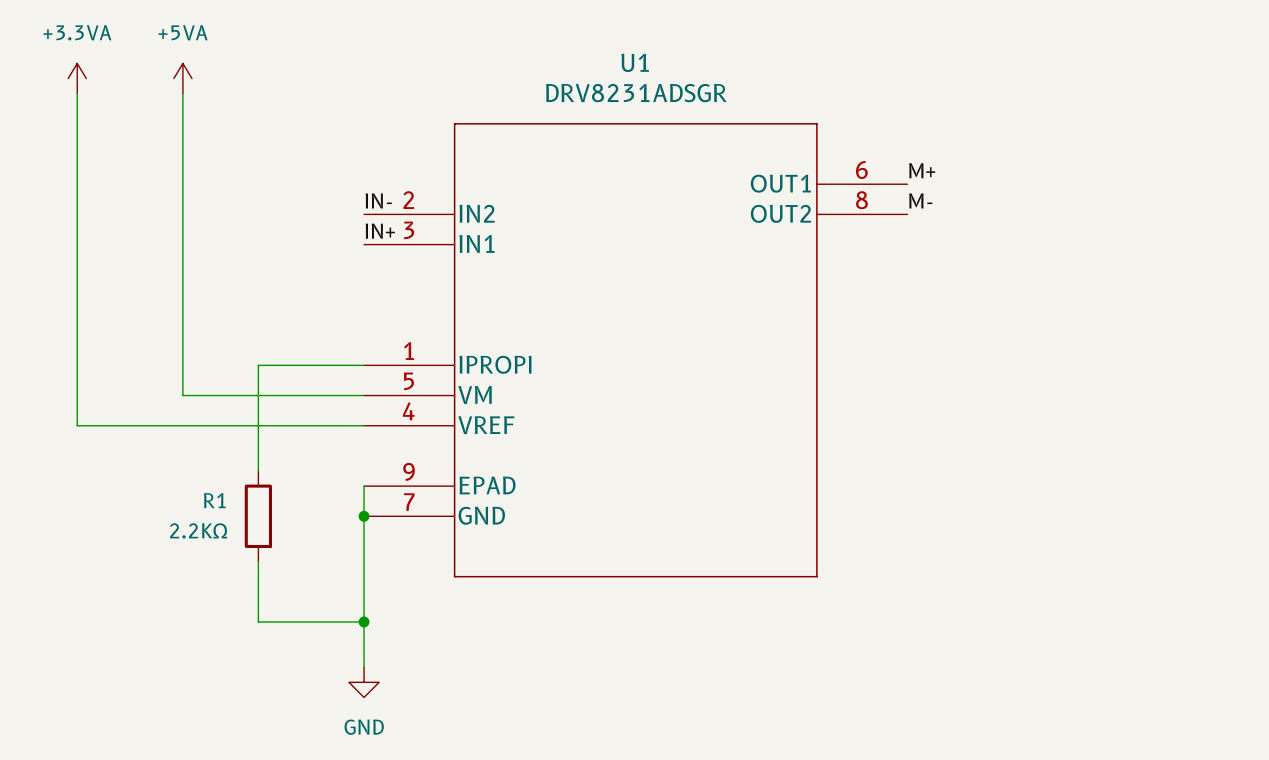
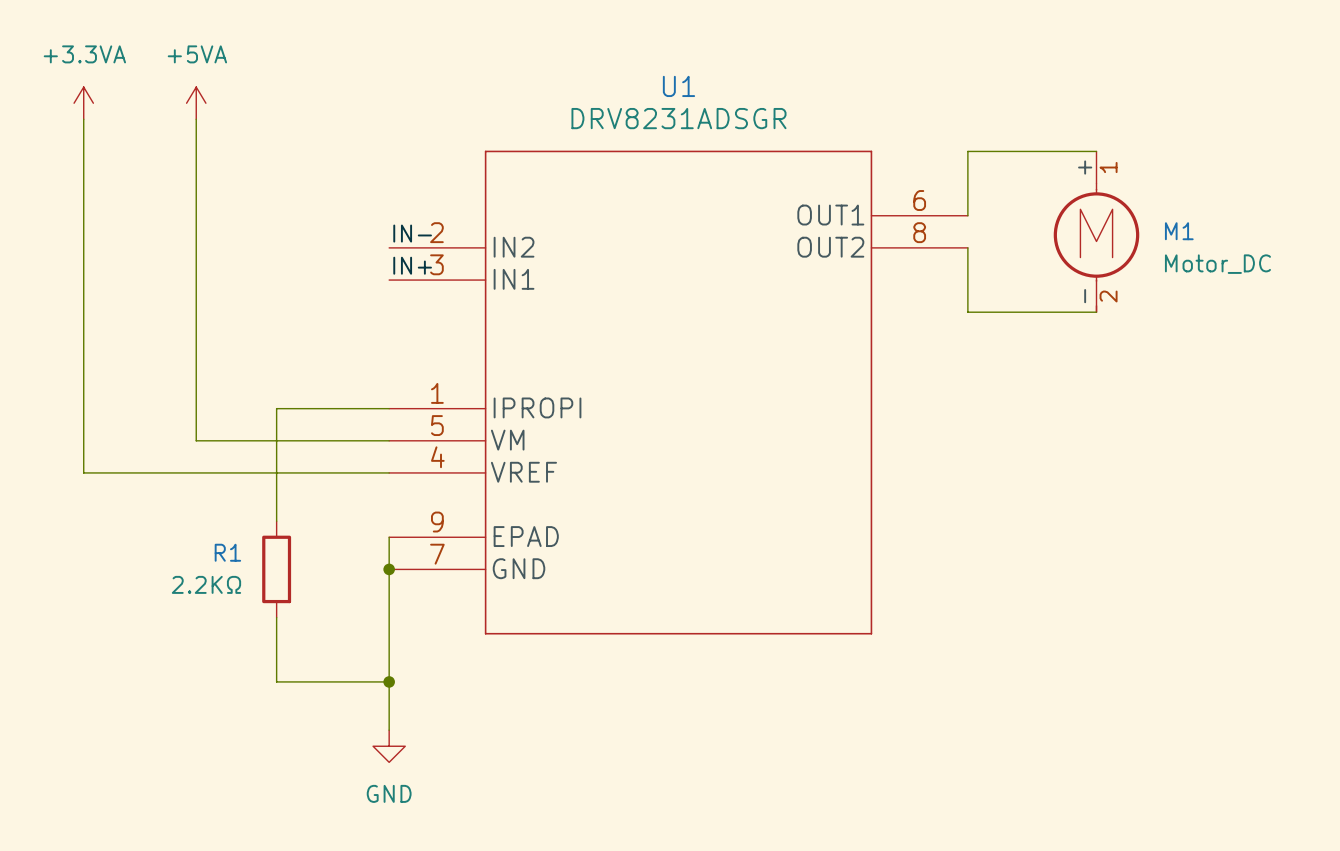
wire: none -> (1096, 151) (967, 151) (967, 215)
label: M+ (922, 170) -> none
M1: none -> Motor_DC (1096, 231)
label: M- (920, 200) -> none
wire: none -> (967, 247) (967, 312) (1096, 312)

